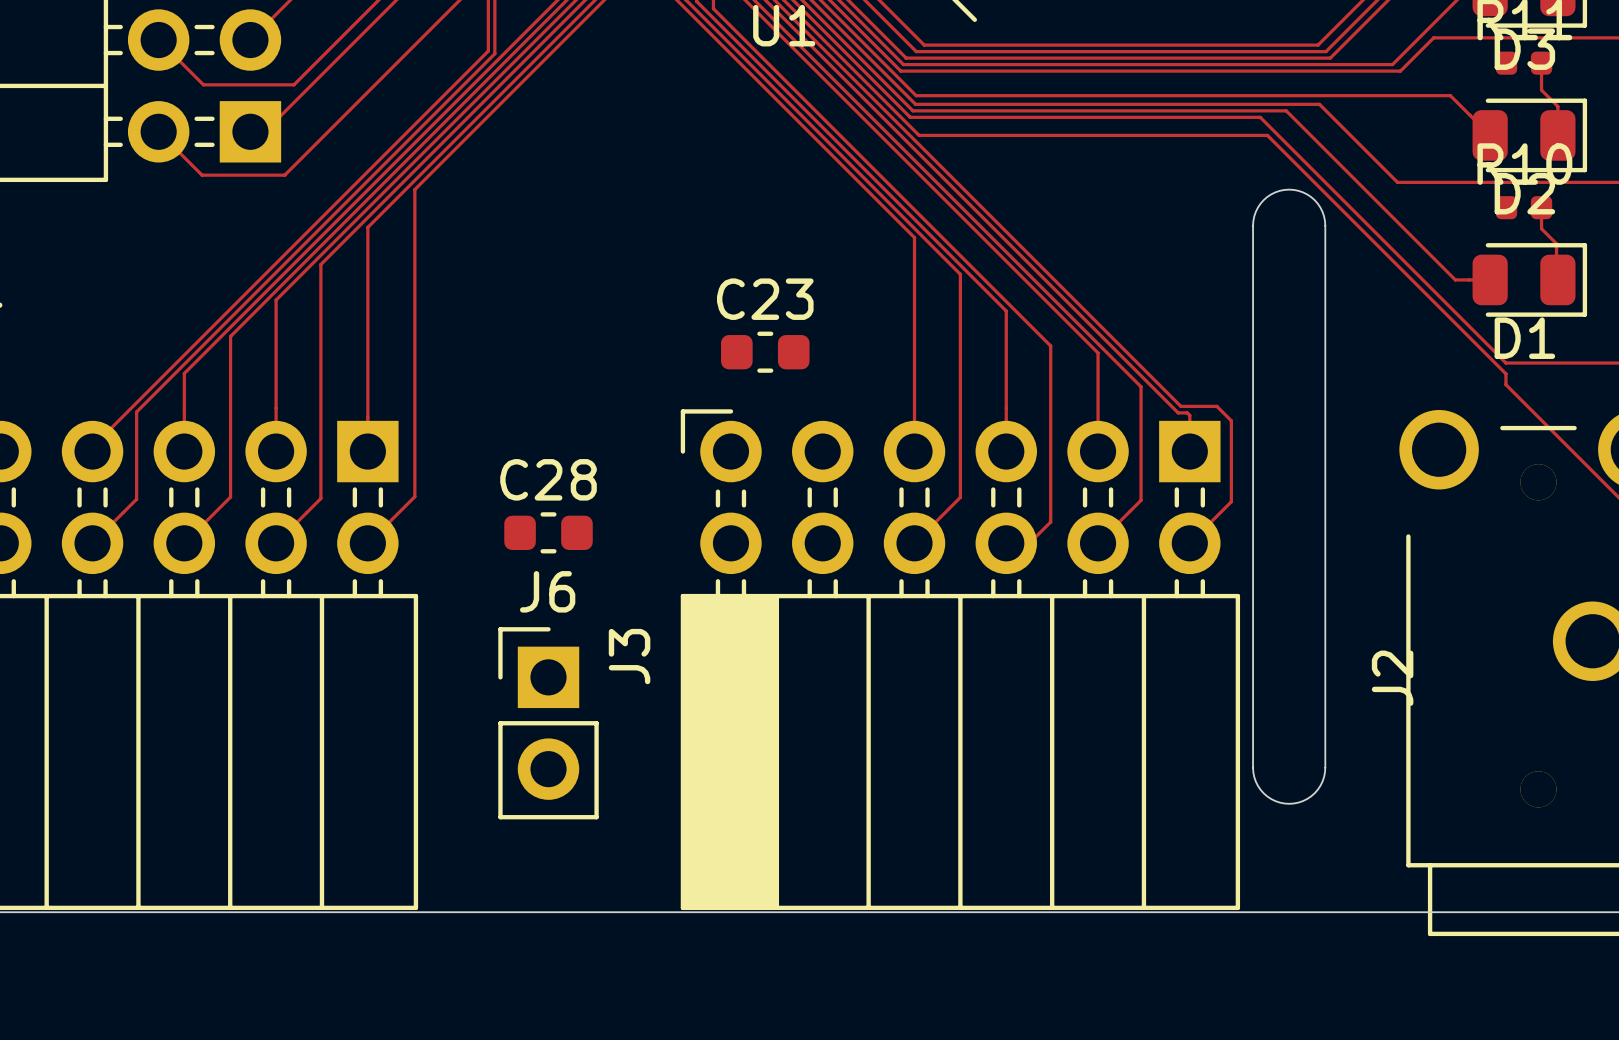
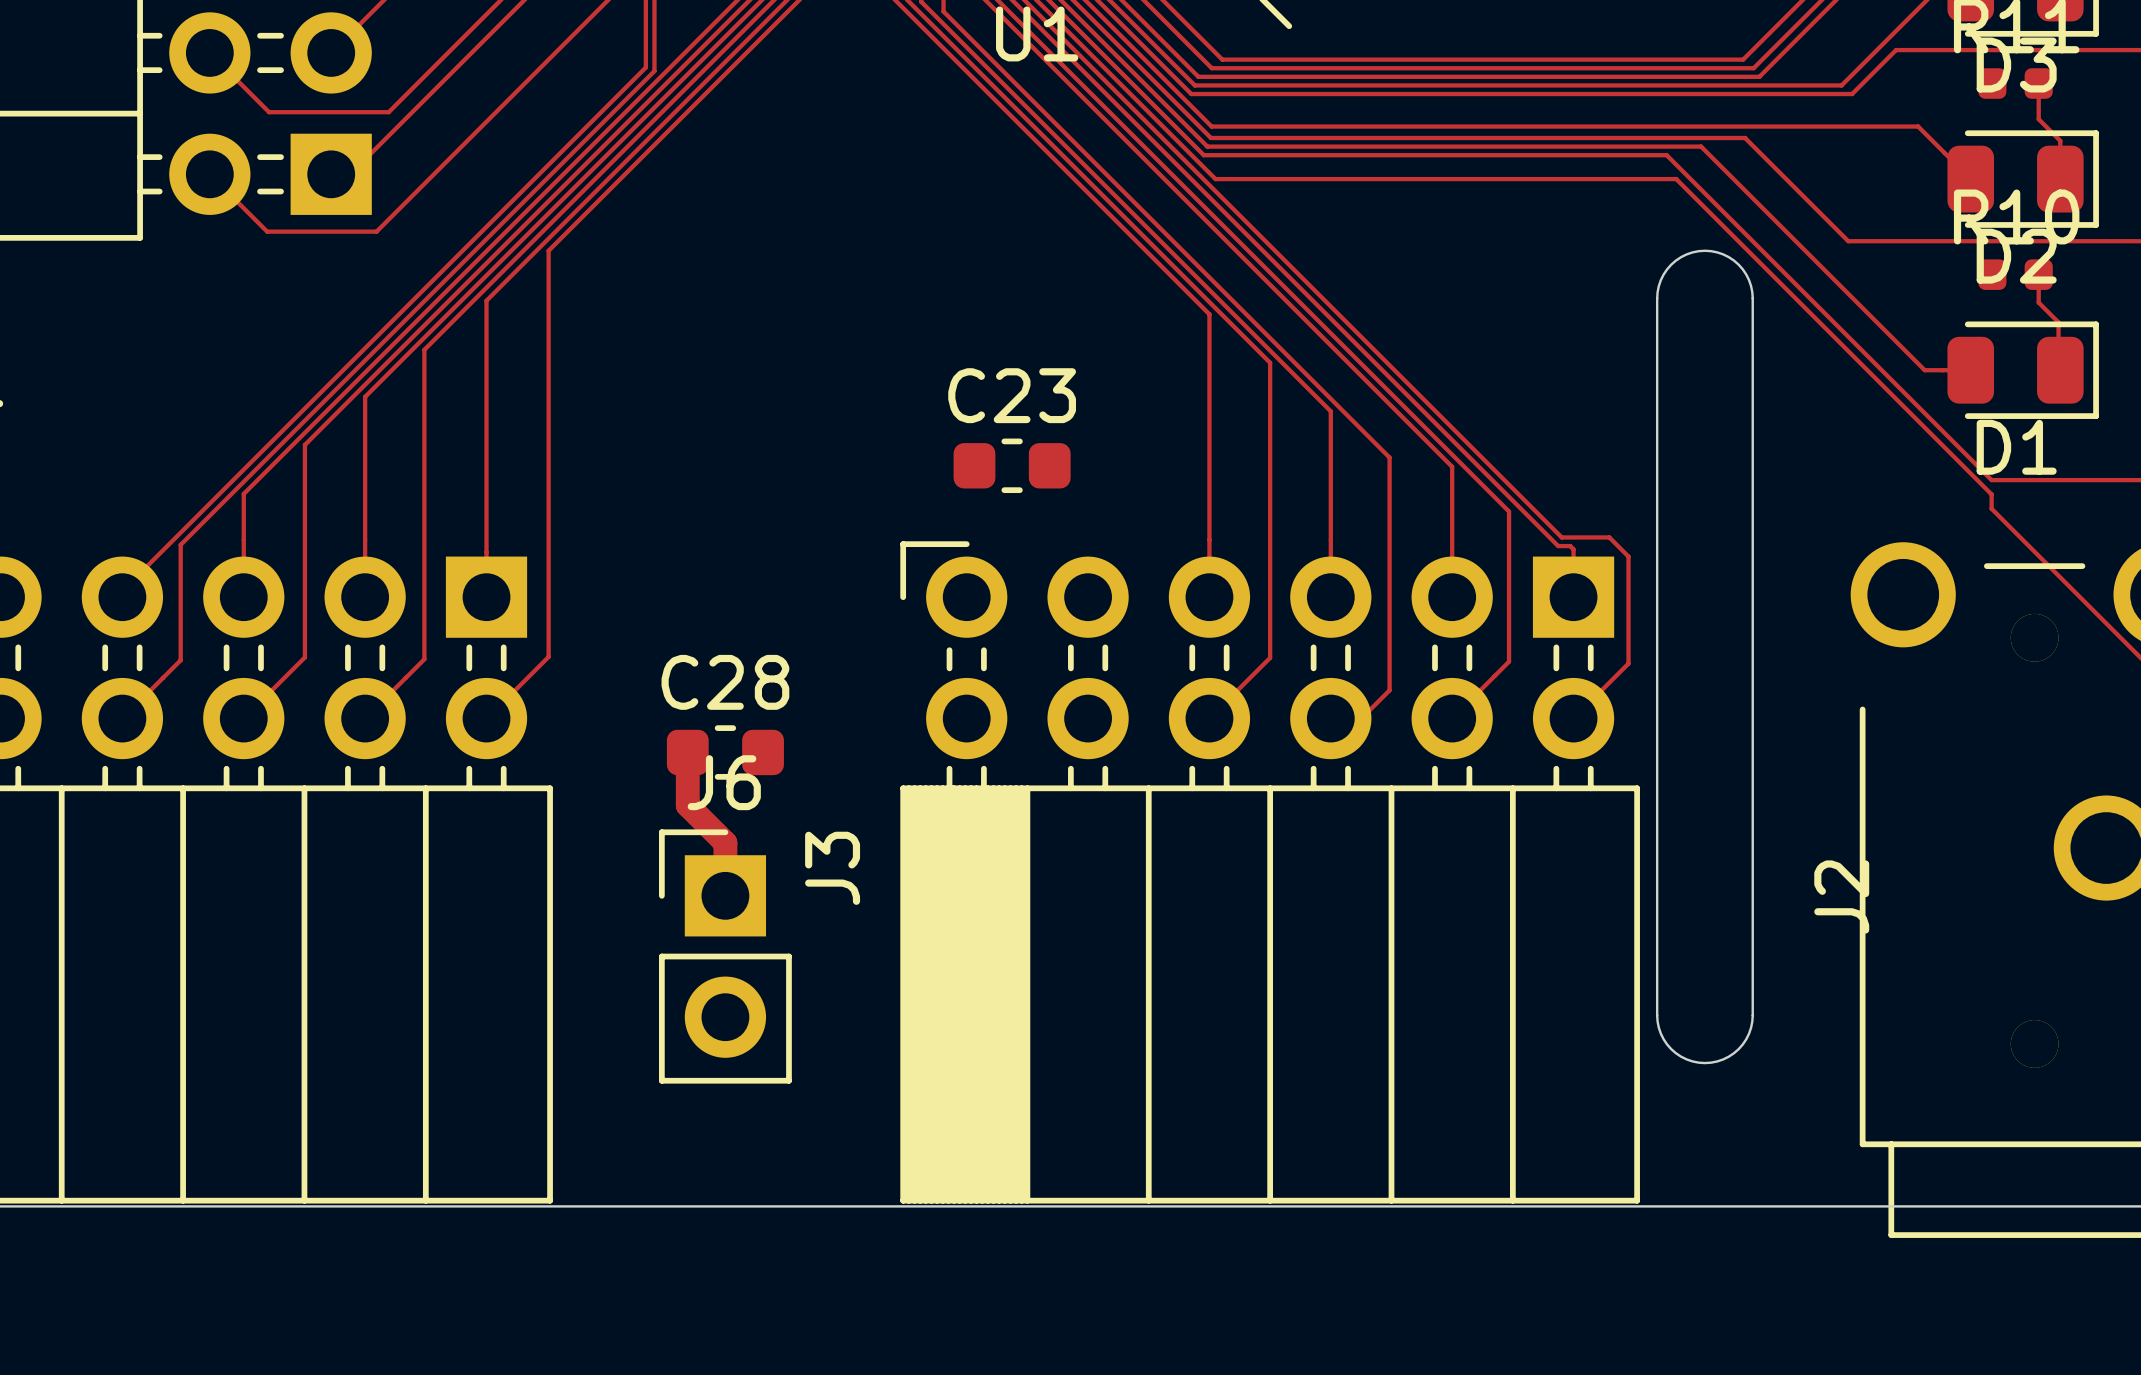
C28 position: (548, 532) -> (725, 752)
track: none -> (687, 752) (687, 805) (725, 842) (725, 895)

